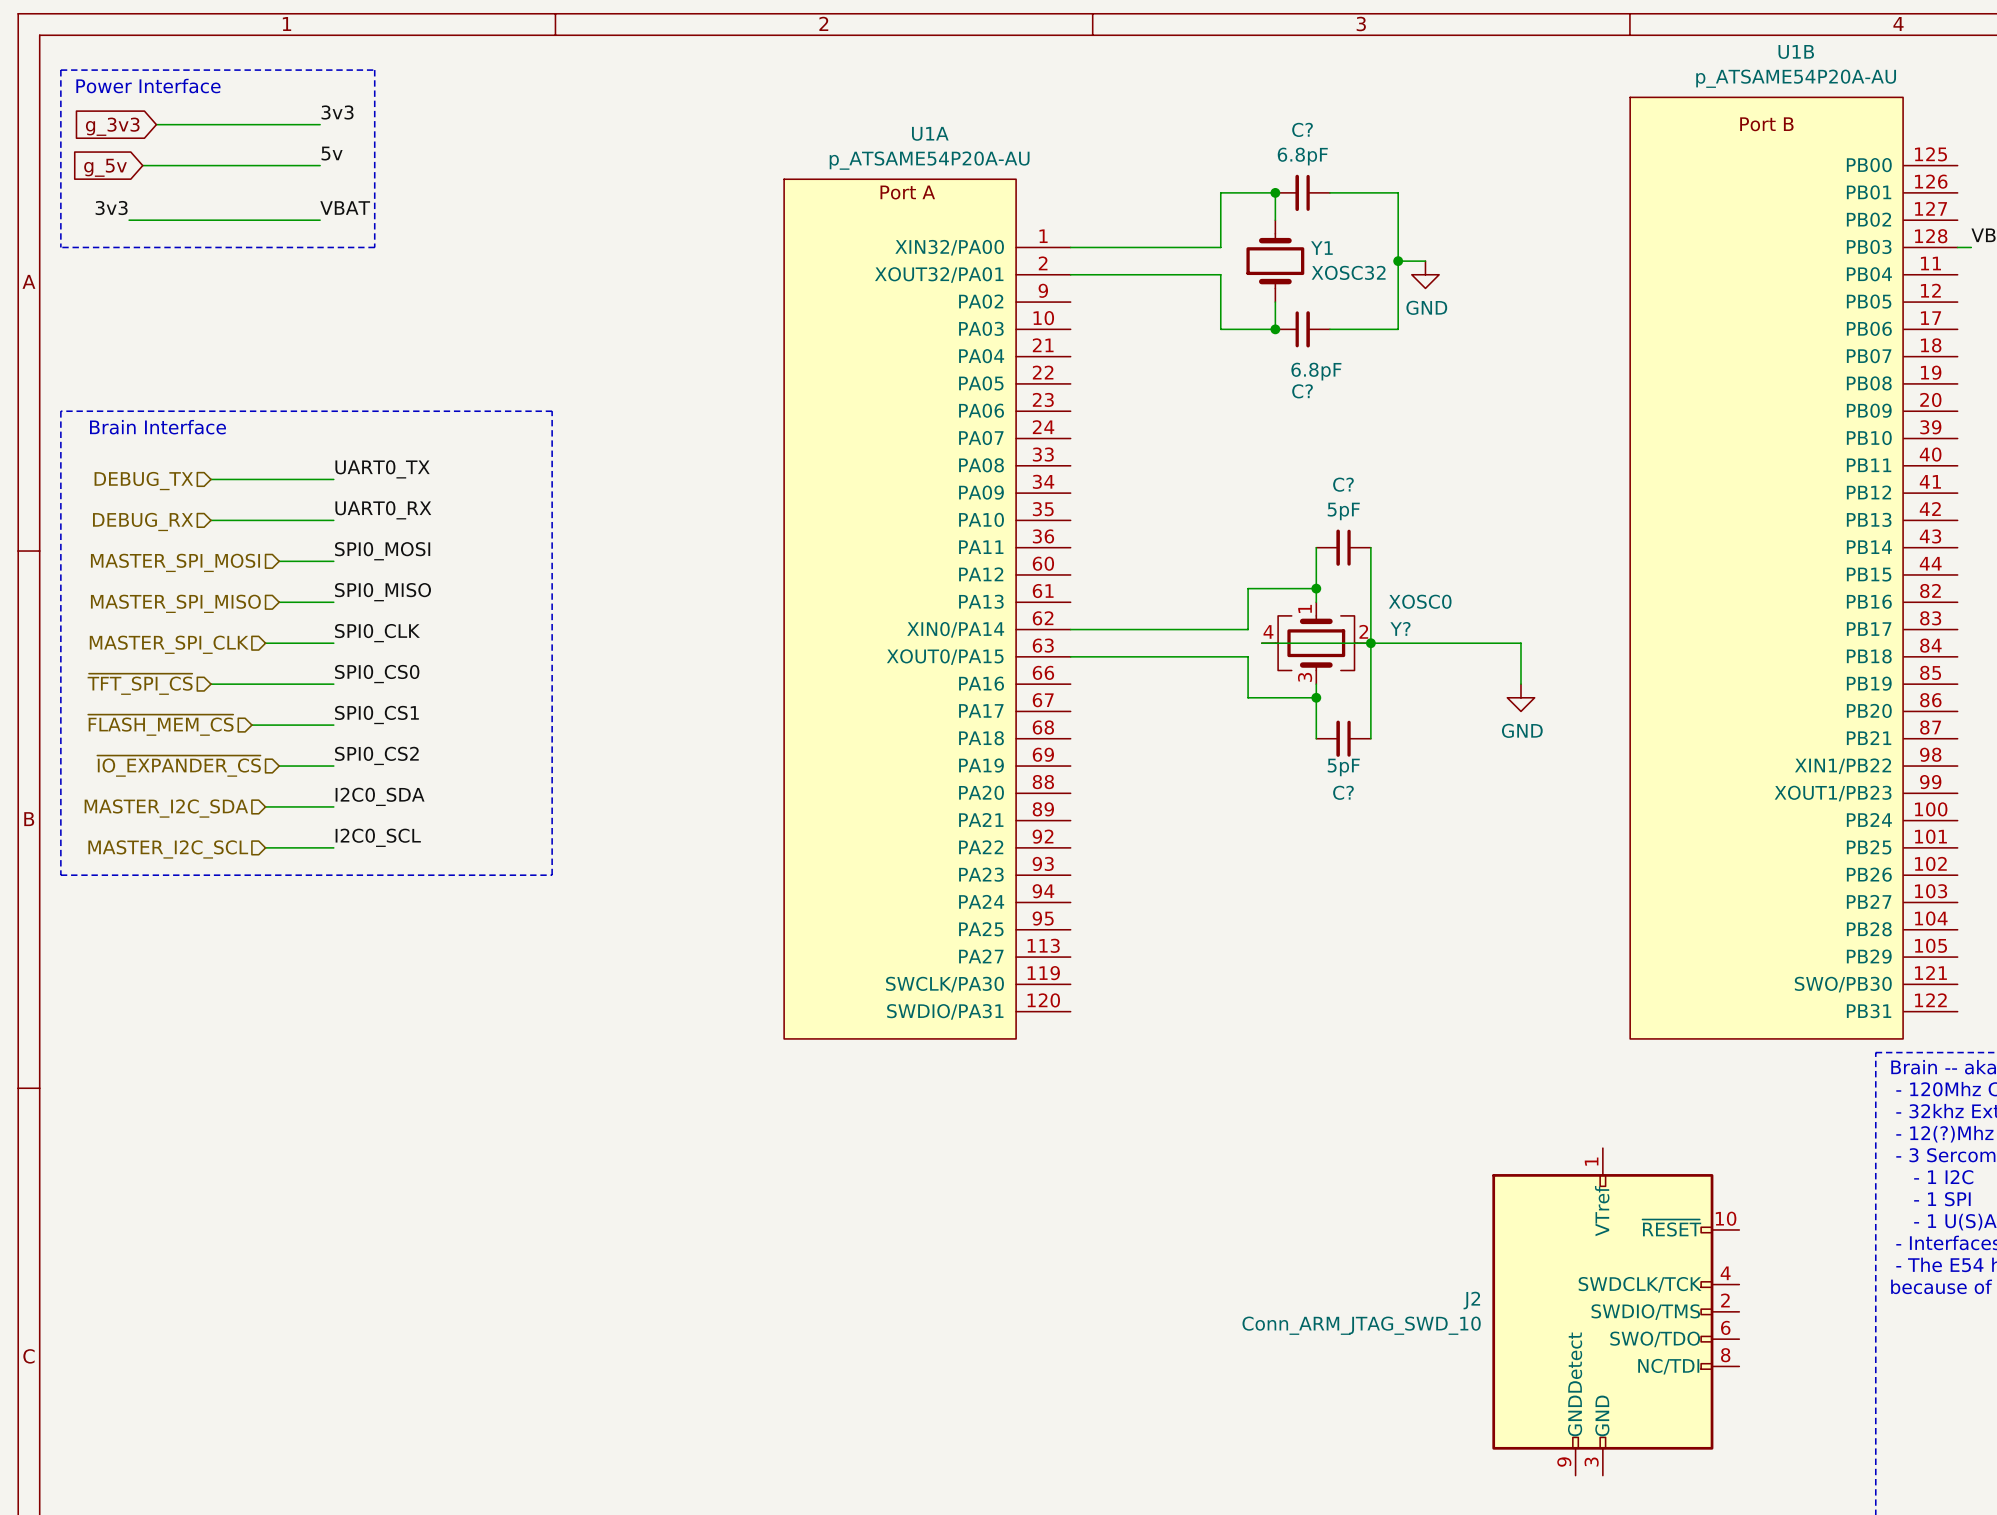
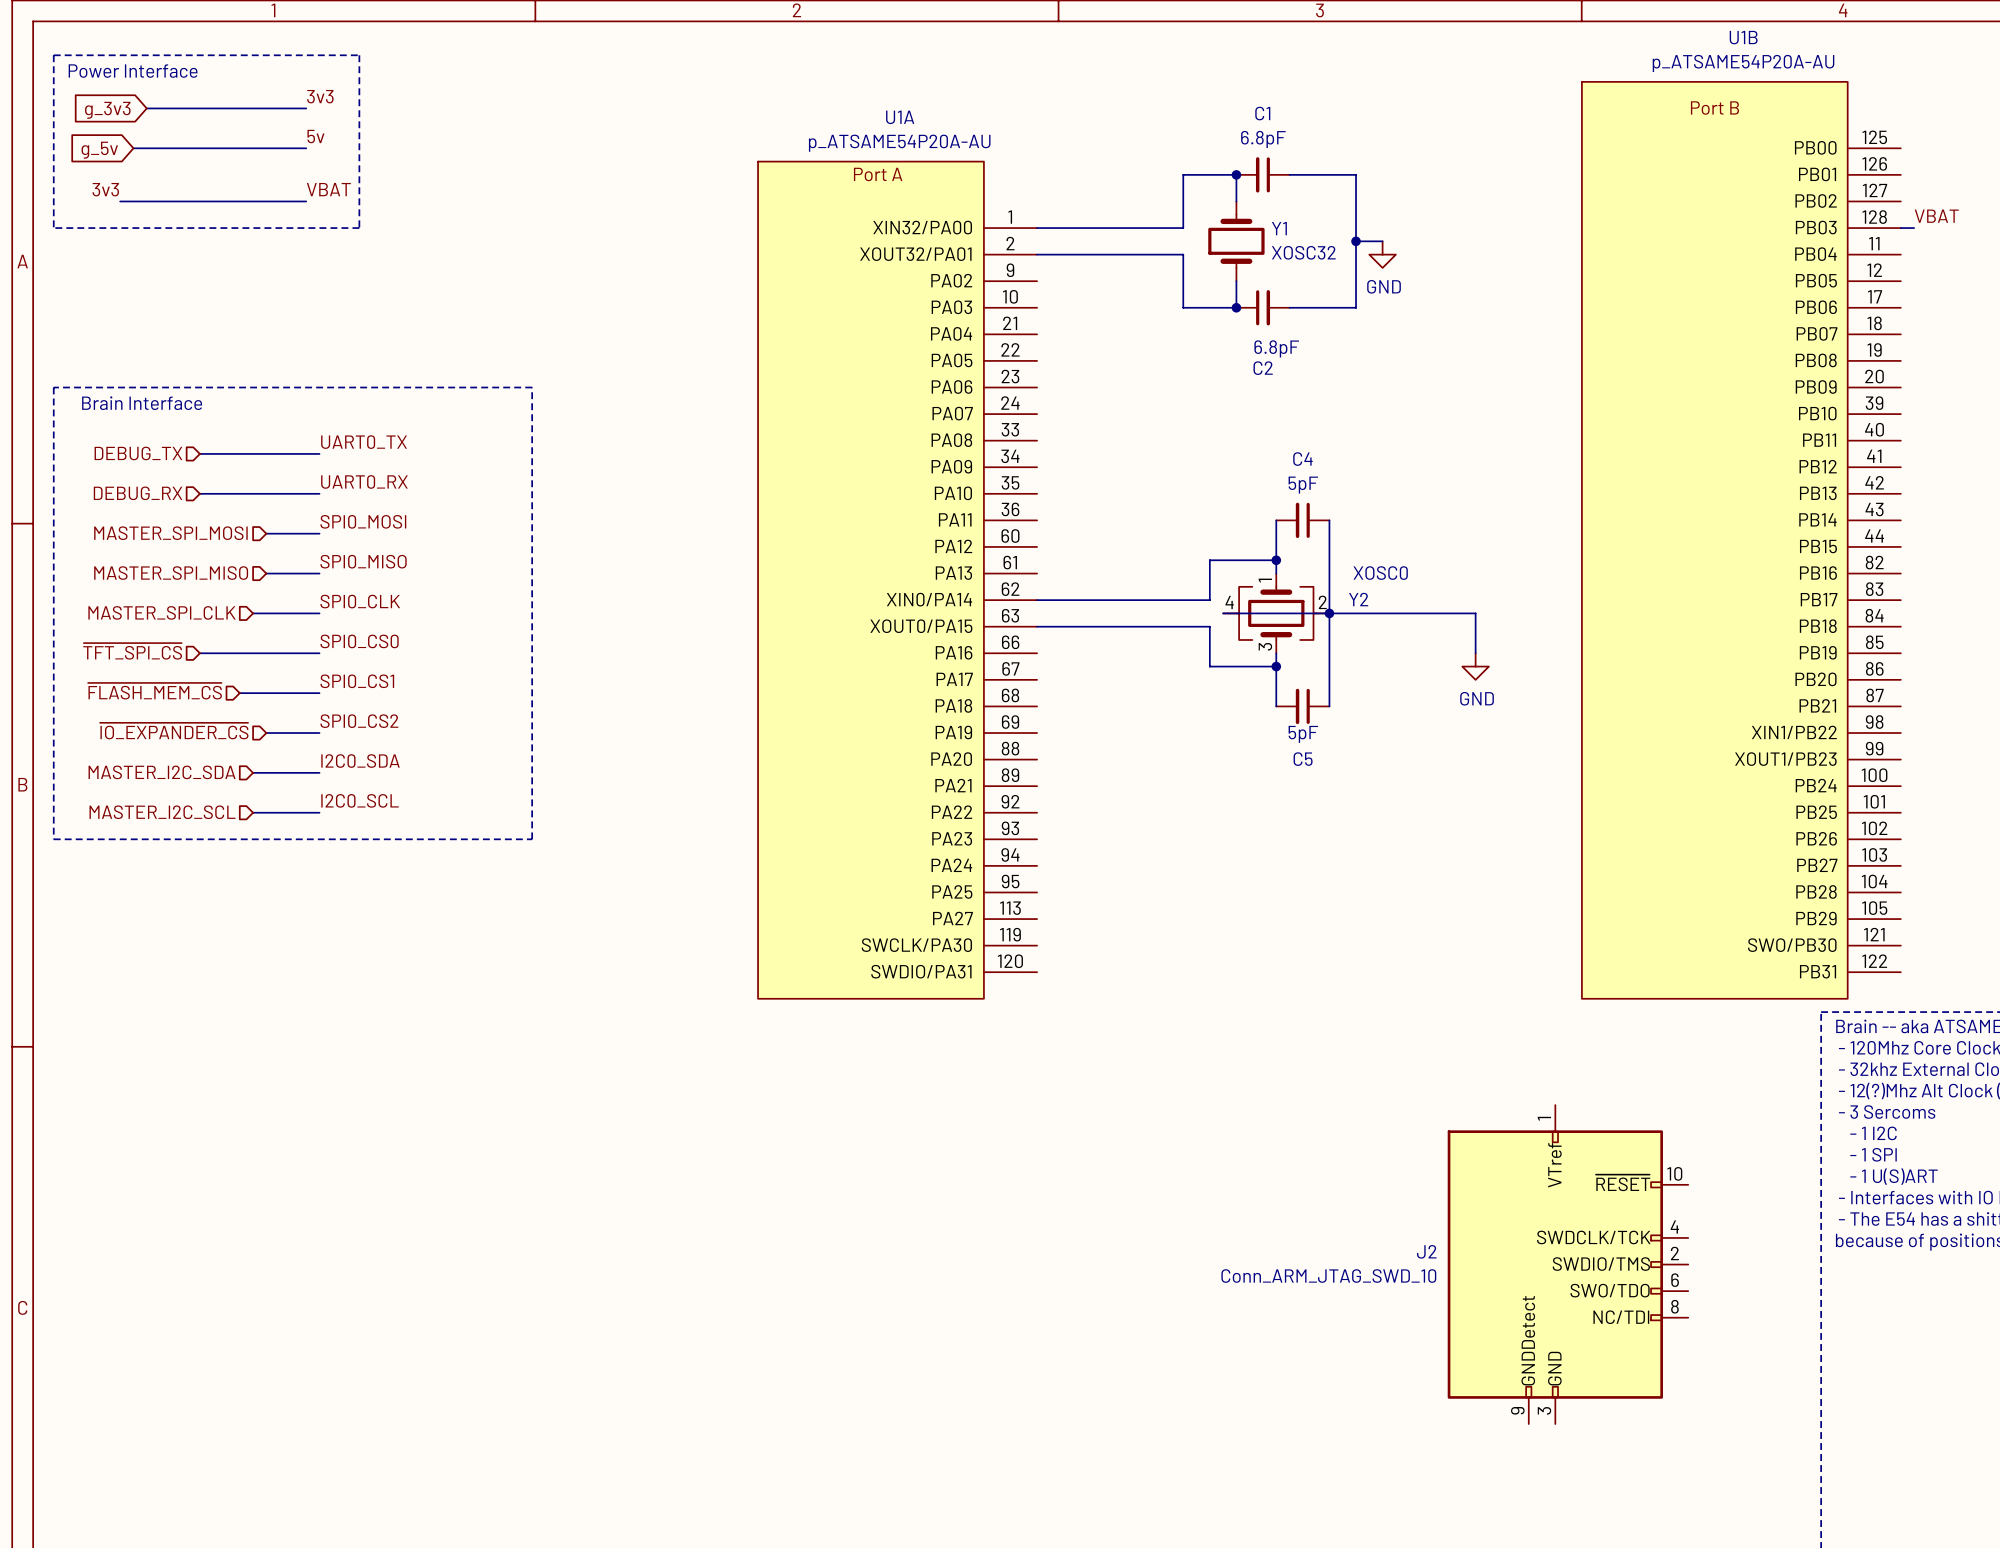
C? name: C? (1302, 129) -> C1 (1262, 113)
C? name: C? (1302, 391) -> C2 (1263, 368)
C? name: C? (1343, 484) -> C4 (1302, 459)
Y? name: Y? (1400, 628) -> Y2 (1358, 599)
C? name: C? (1343, 792) -> C5 (1303, 759)

